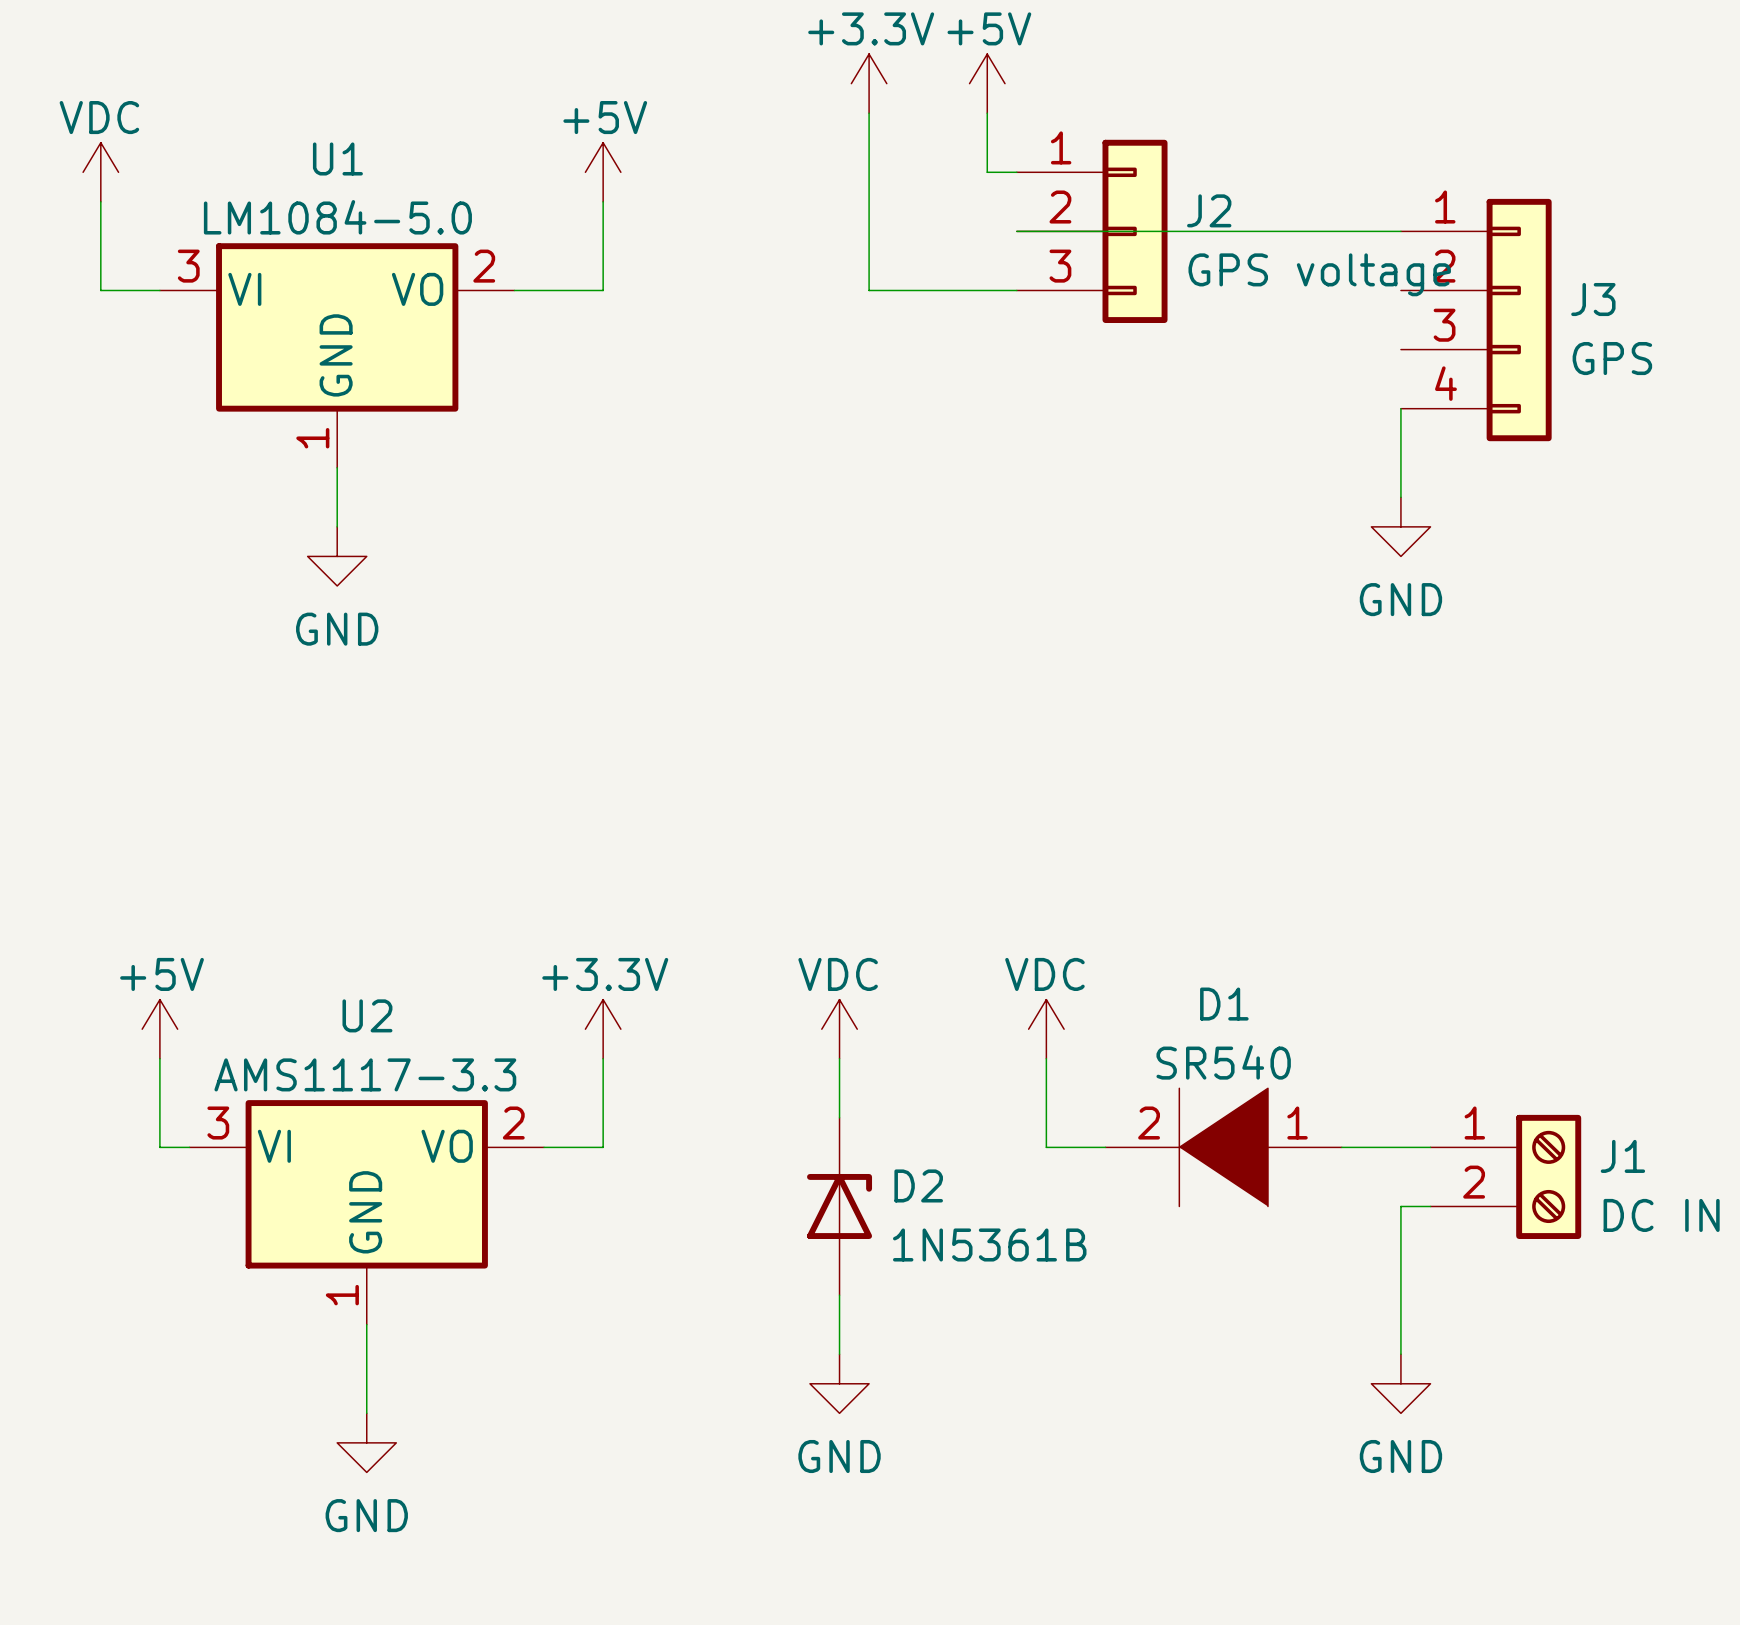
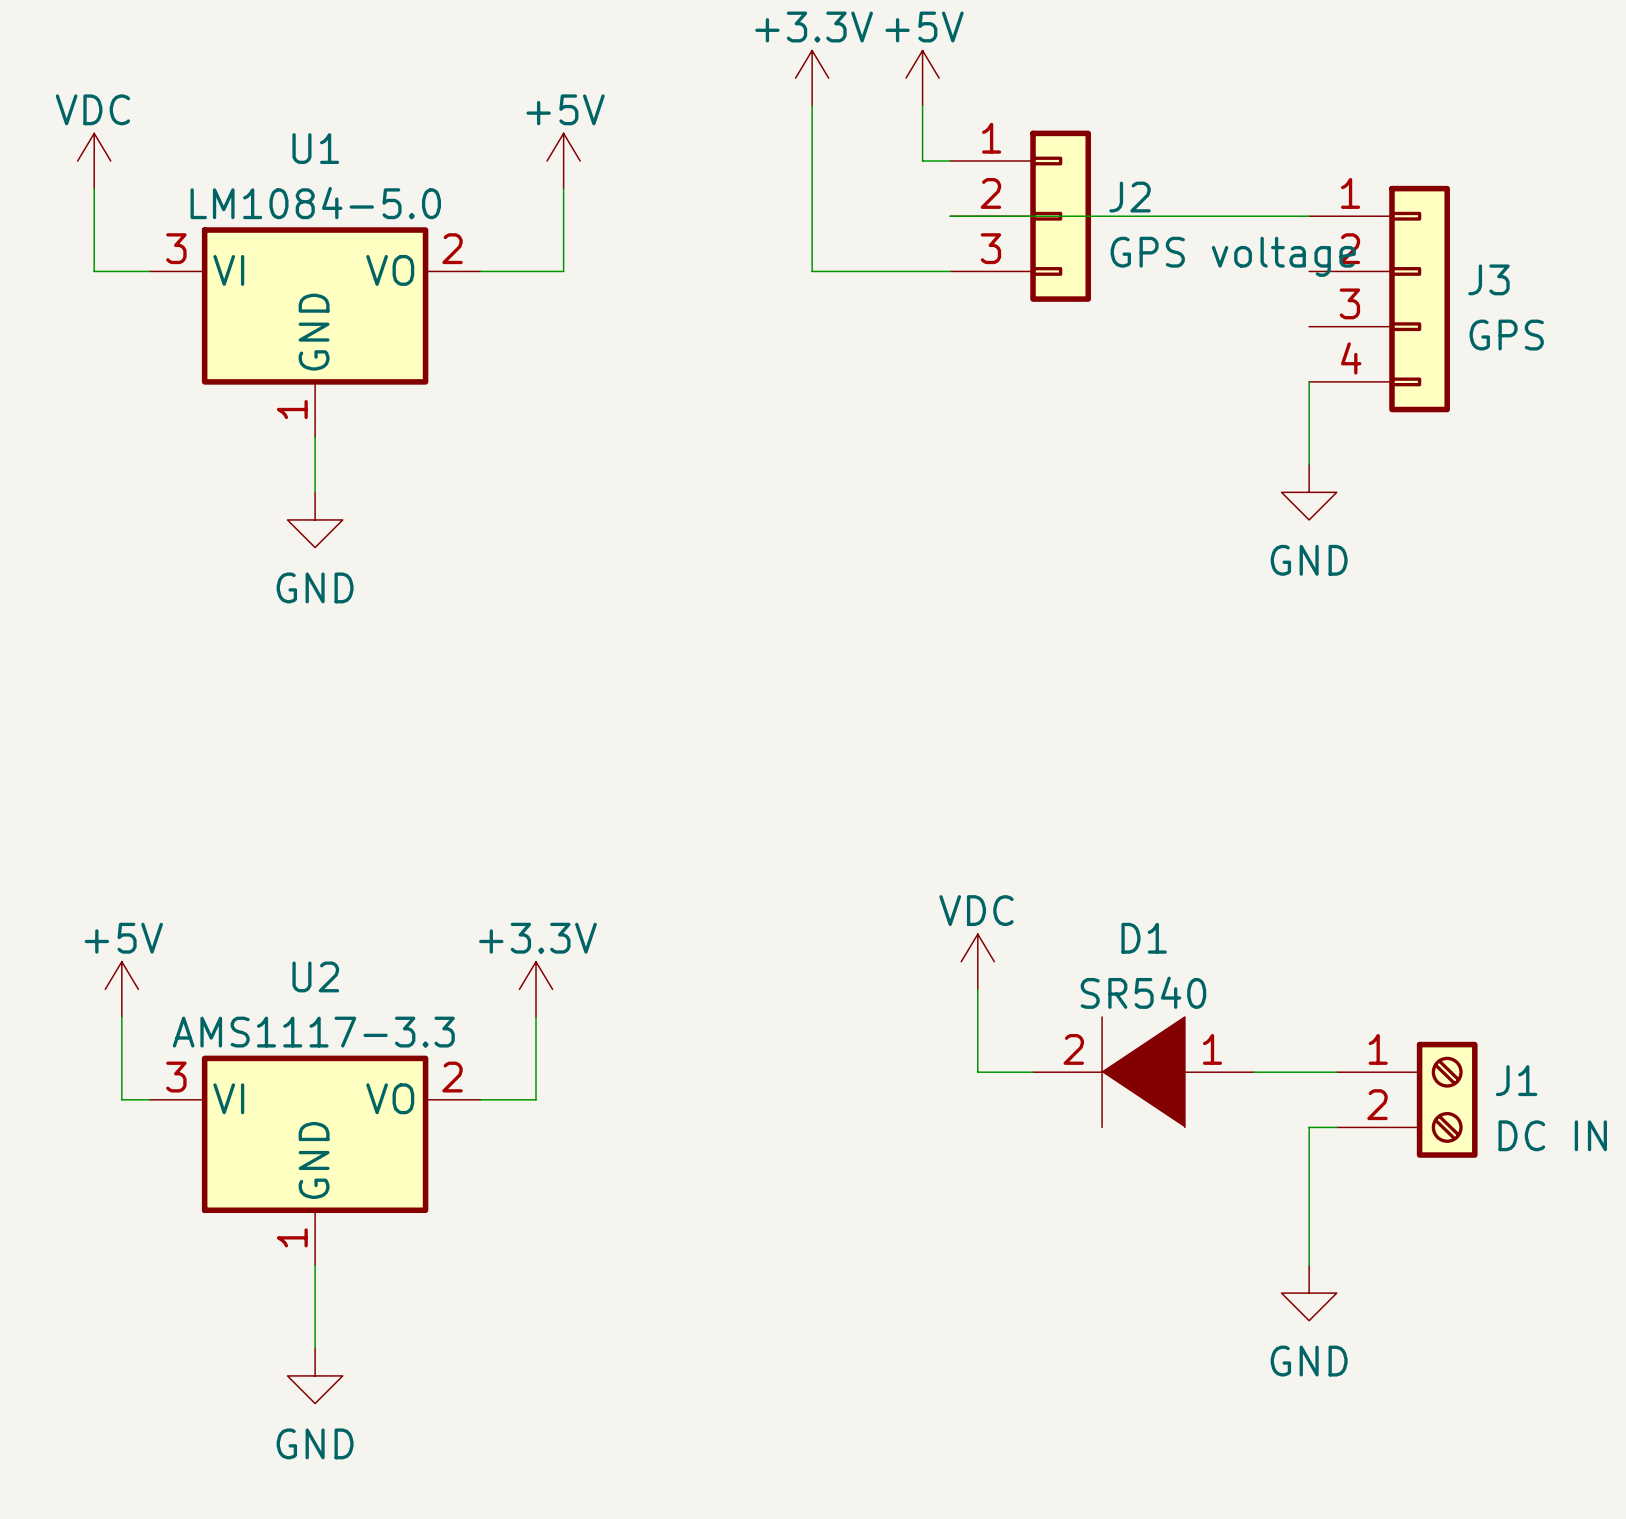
power symbol position: +5V (159, 1029) -> +5V (121, 989)
power symbol position: +3.3V (603, 1029) -> +3.3V (536, 989)
power symbol: VDC (839, 1029) -> none
wire: (159, 1058) (159, 1147) (189, 1147) -> (121, 1016) (121, 1099) (149, 1099)
wire: (603, 1058) (603, 1147) (544, 1147) -> (536, 1016) (536, 1099) (480, 1099)
wire: (839, 1058) (839, 1117) -> none
D2: 1N5361B (839, 1206) -> none
U2 position: (366, 1212) -> (315, 1160)
wire: (839, 1295) (839, 1354) -> none
wire: (366, 1324) (366, 1413) -> (315, 1265) (315, 1348)
power symbol: GND (839, 1383) -> none
power symbol position: GND (366, 1442) -> GND (315, 1375)

